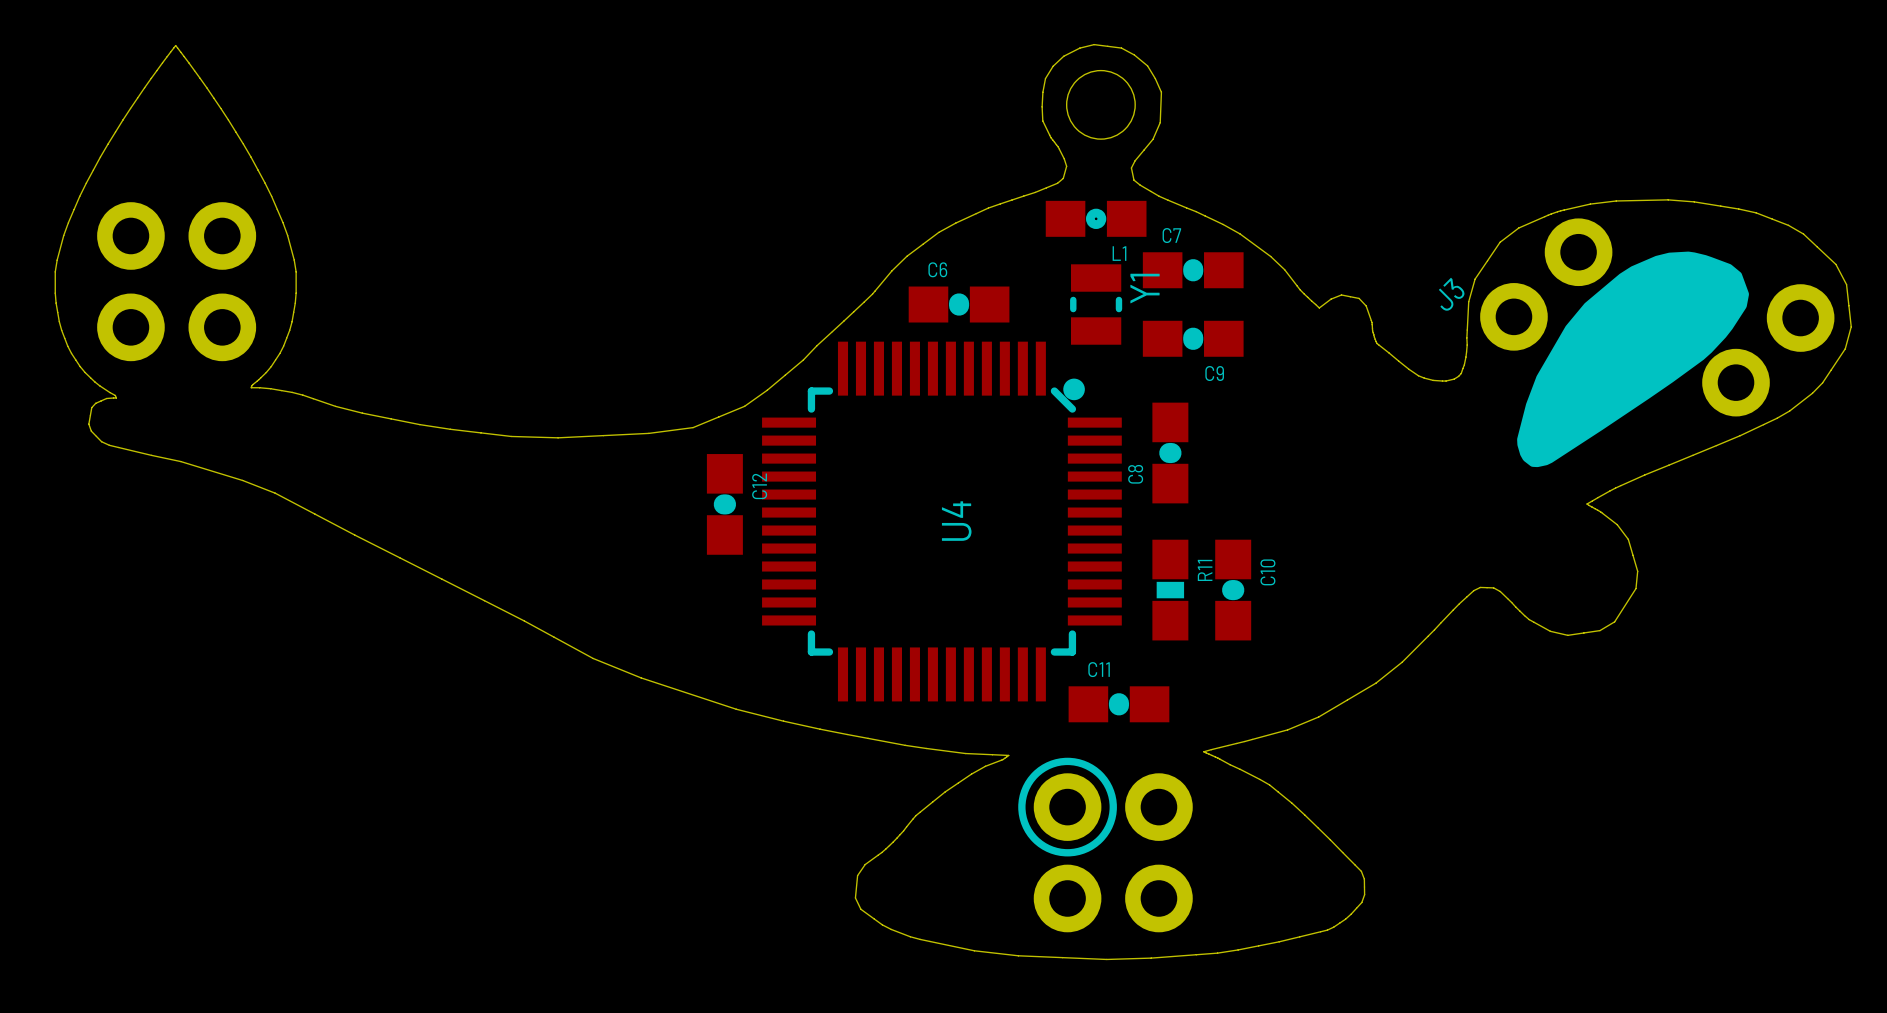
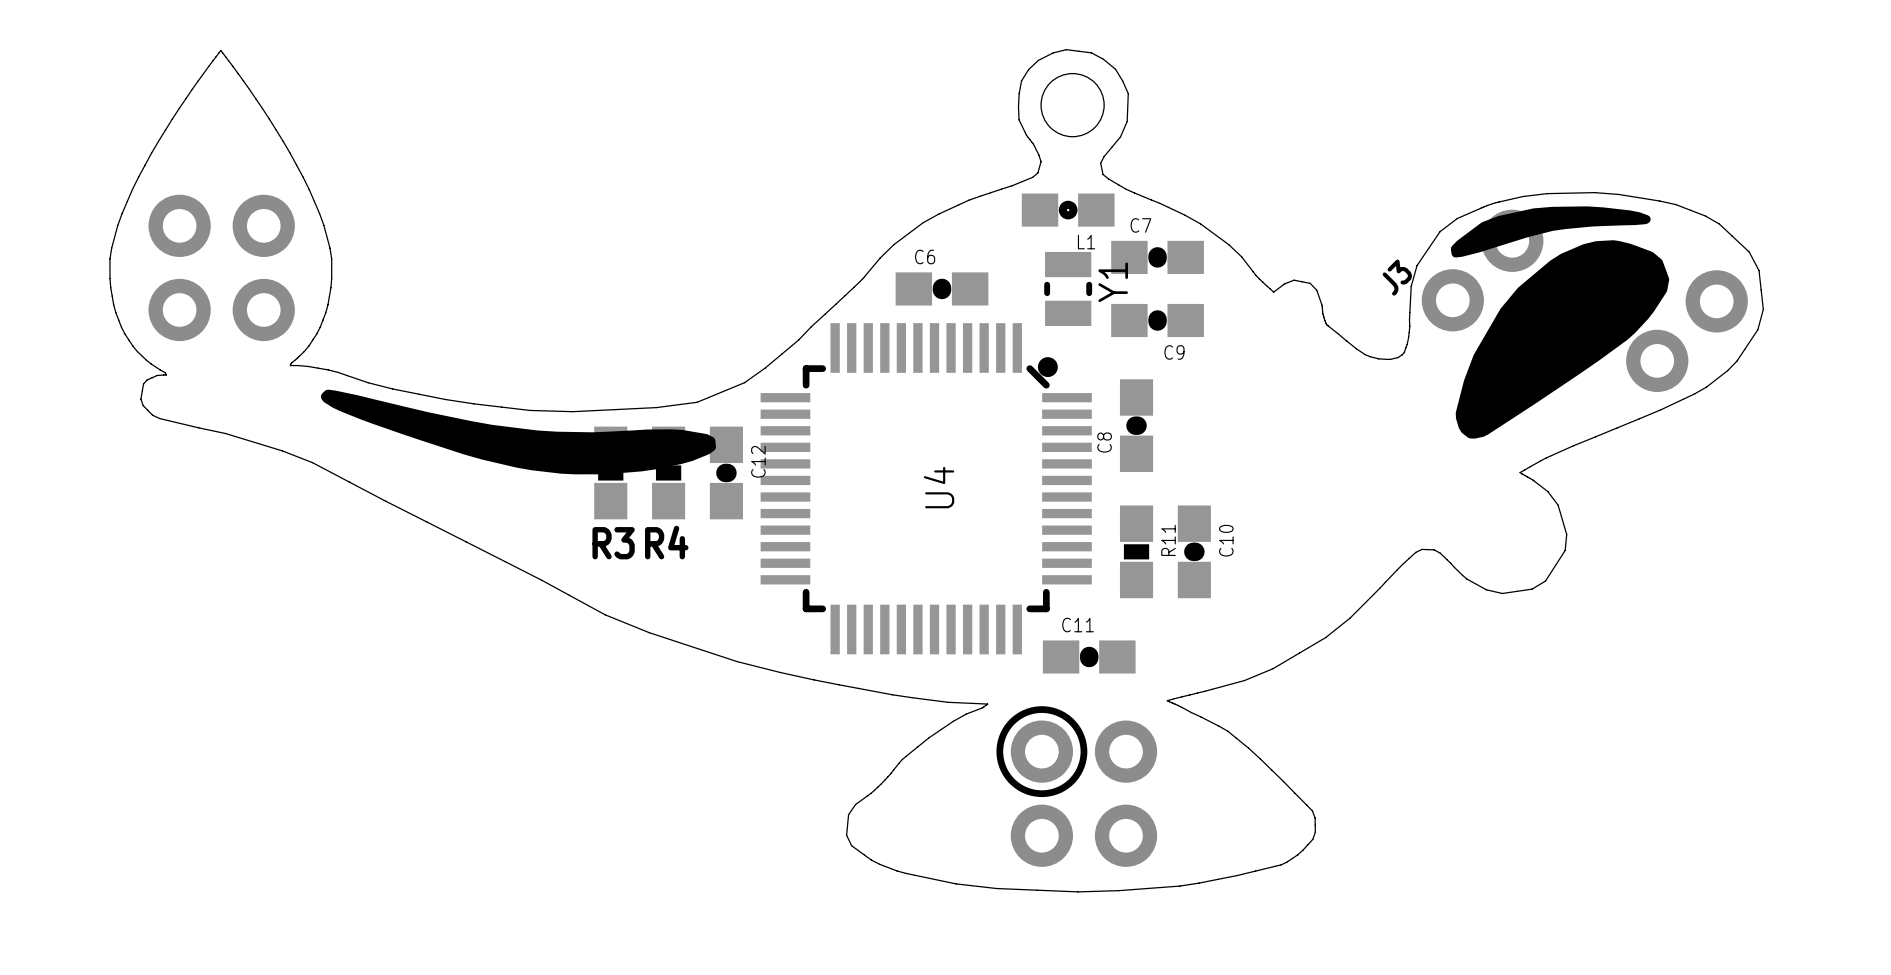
drawing: none -> [1450, 206, 1651, 258]
drawing: none -> [320, 389, 716, 475]
R3: none -> (610, 472)
R4: none -> (668, 472)

